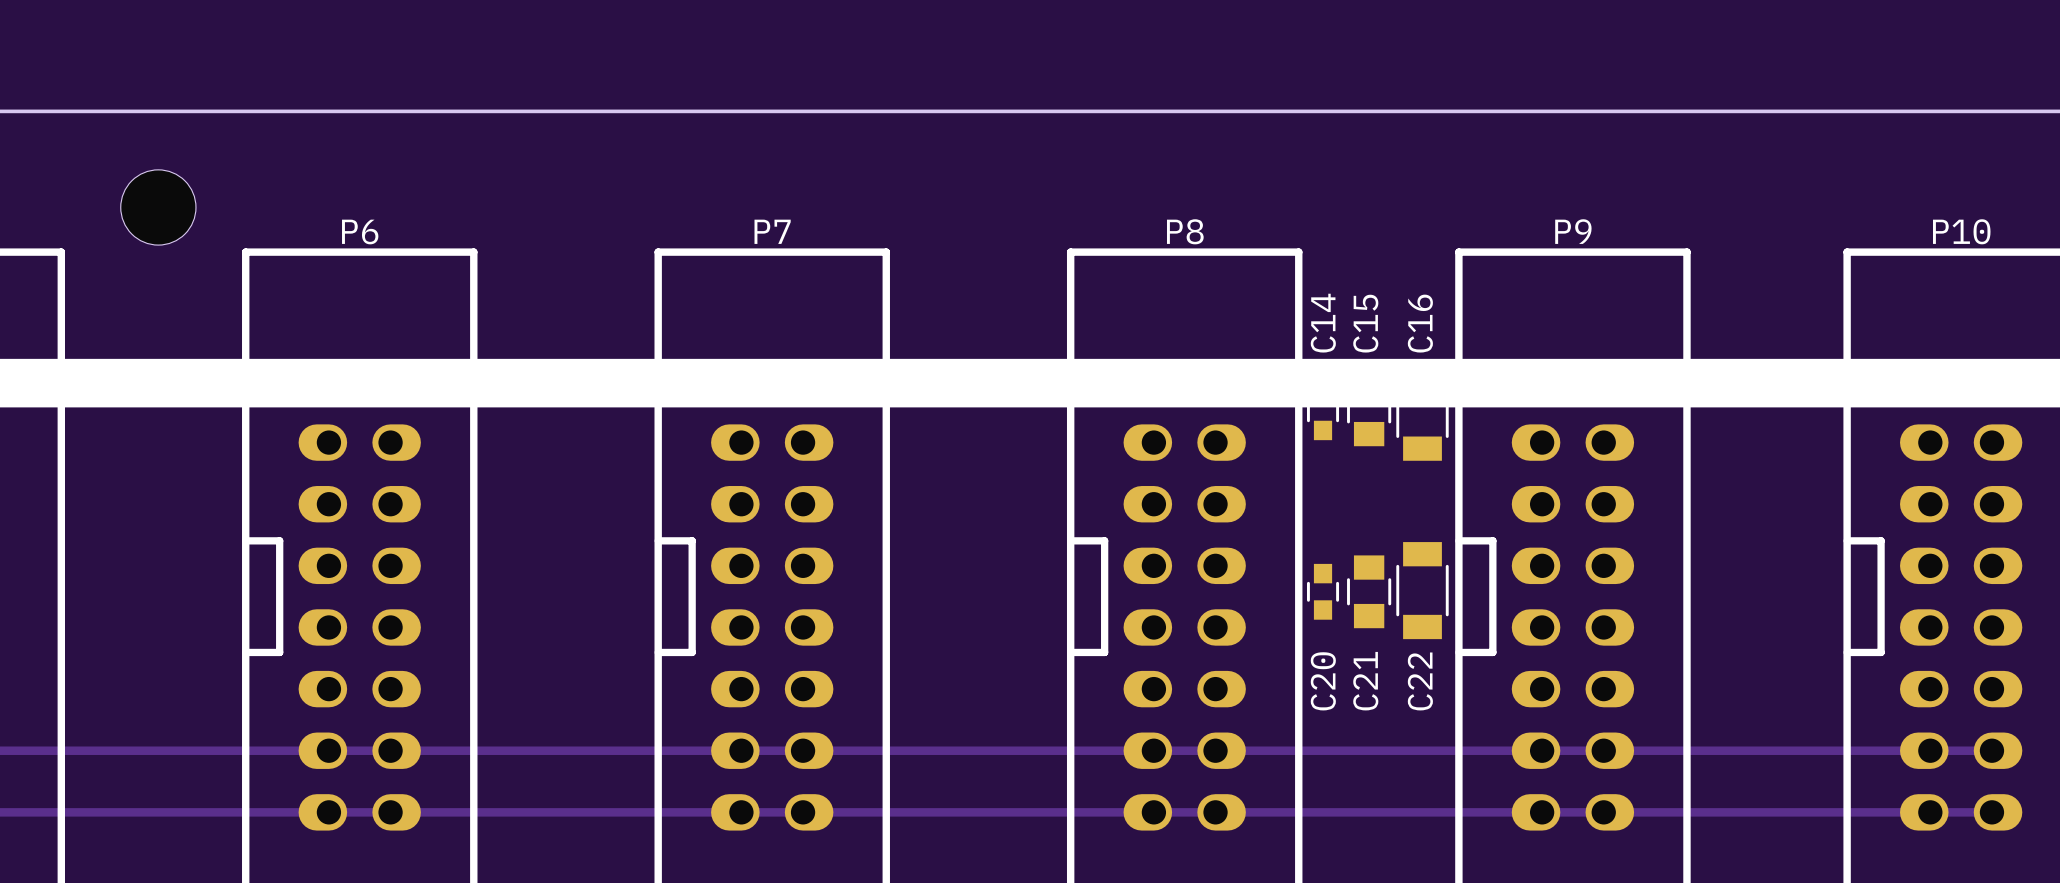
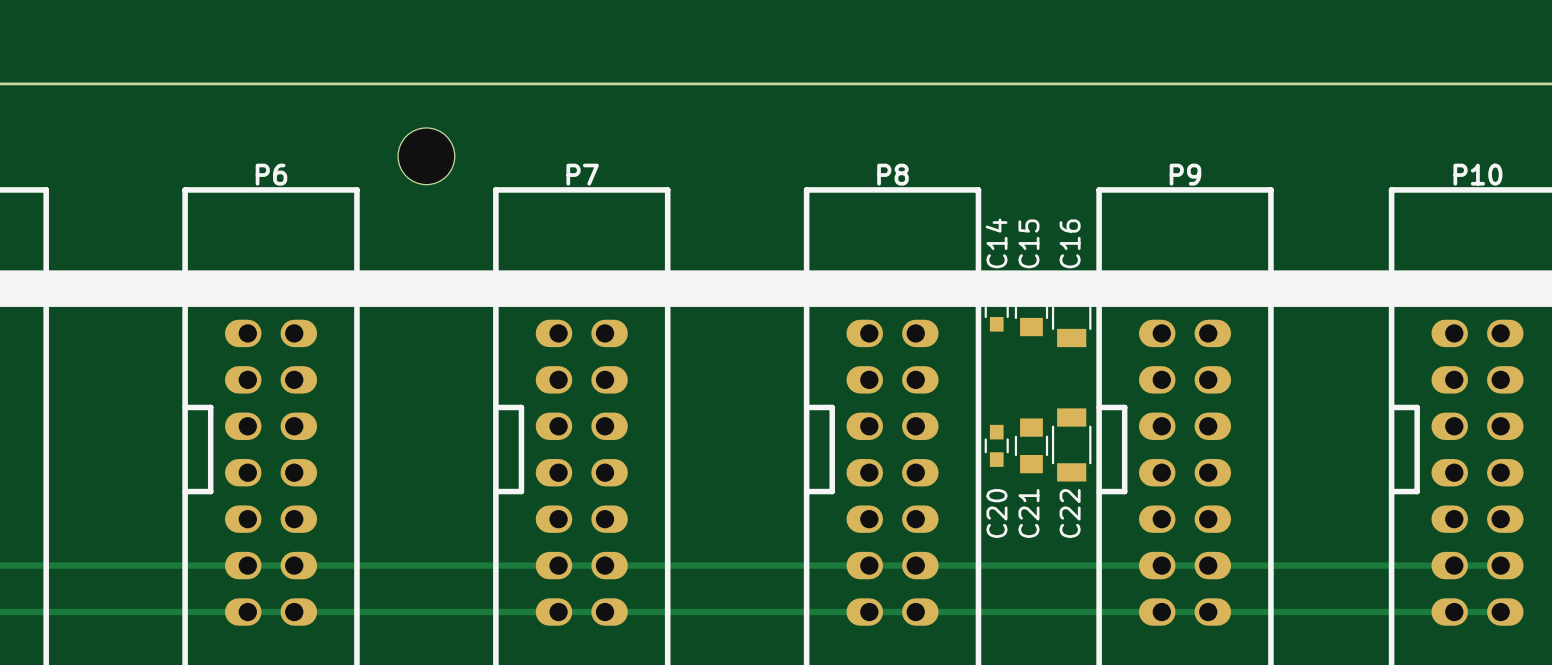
part position: (158, 207) -> (426, 156)

